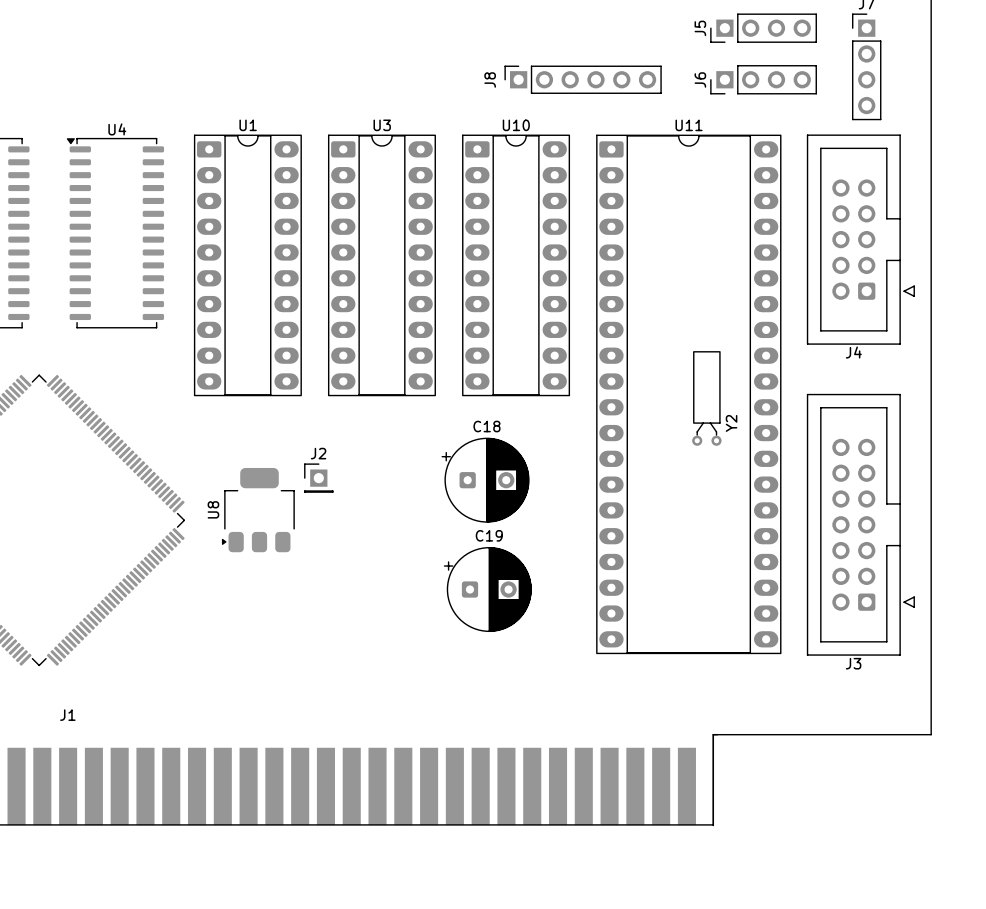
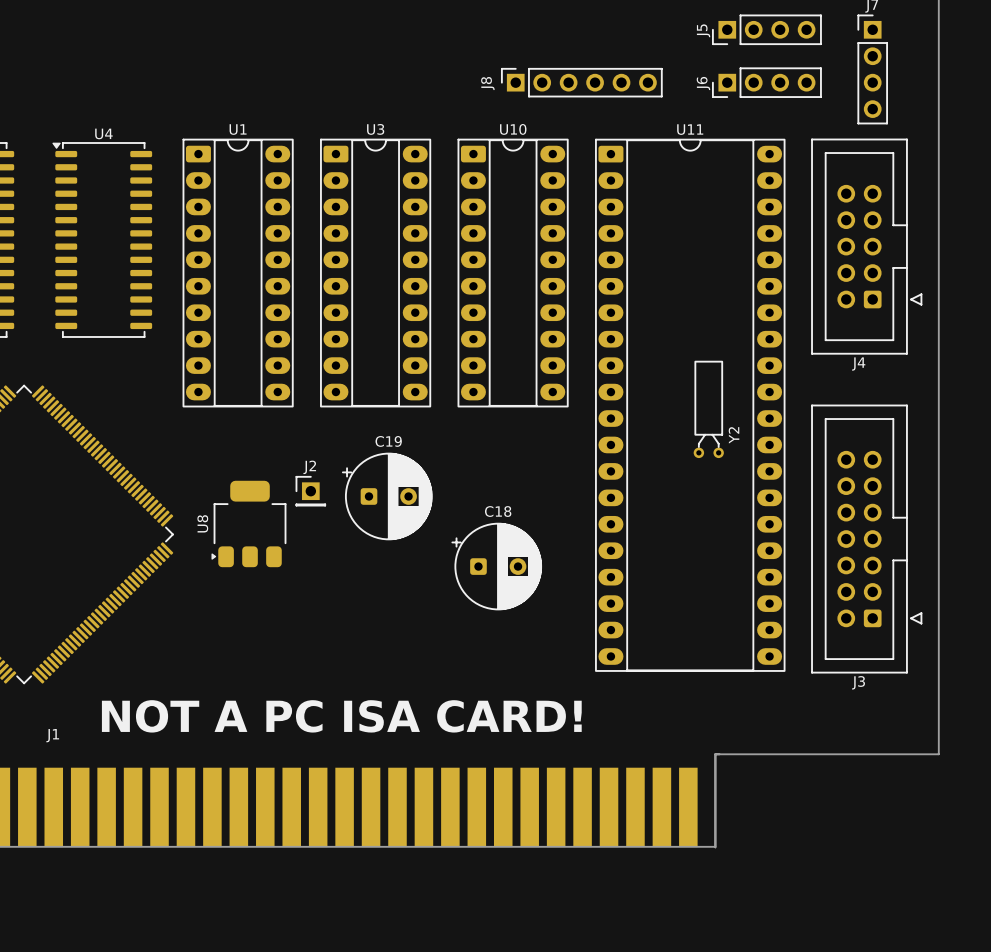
C18 position: (485, 480) -> (496, 566)
C19 position: (487, 589) -> (387, 496)
text: none -> NOT A PC ISA CARD! (341, 716)

